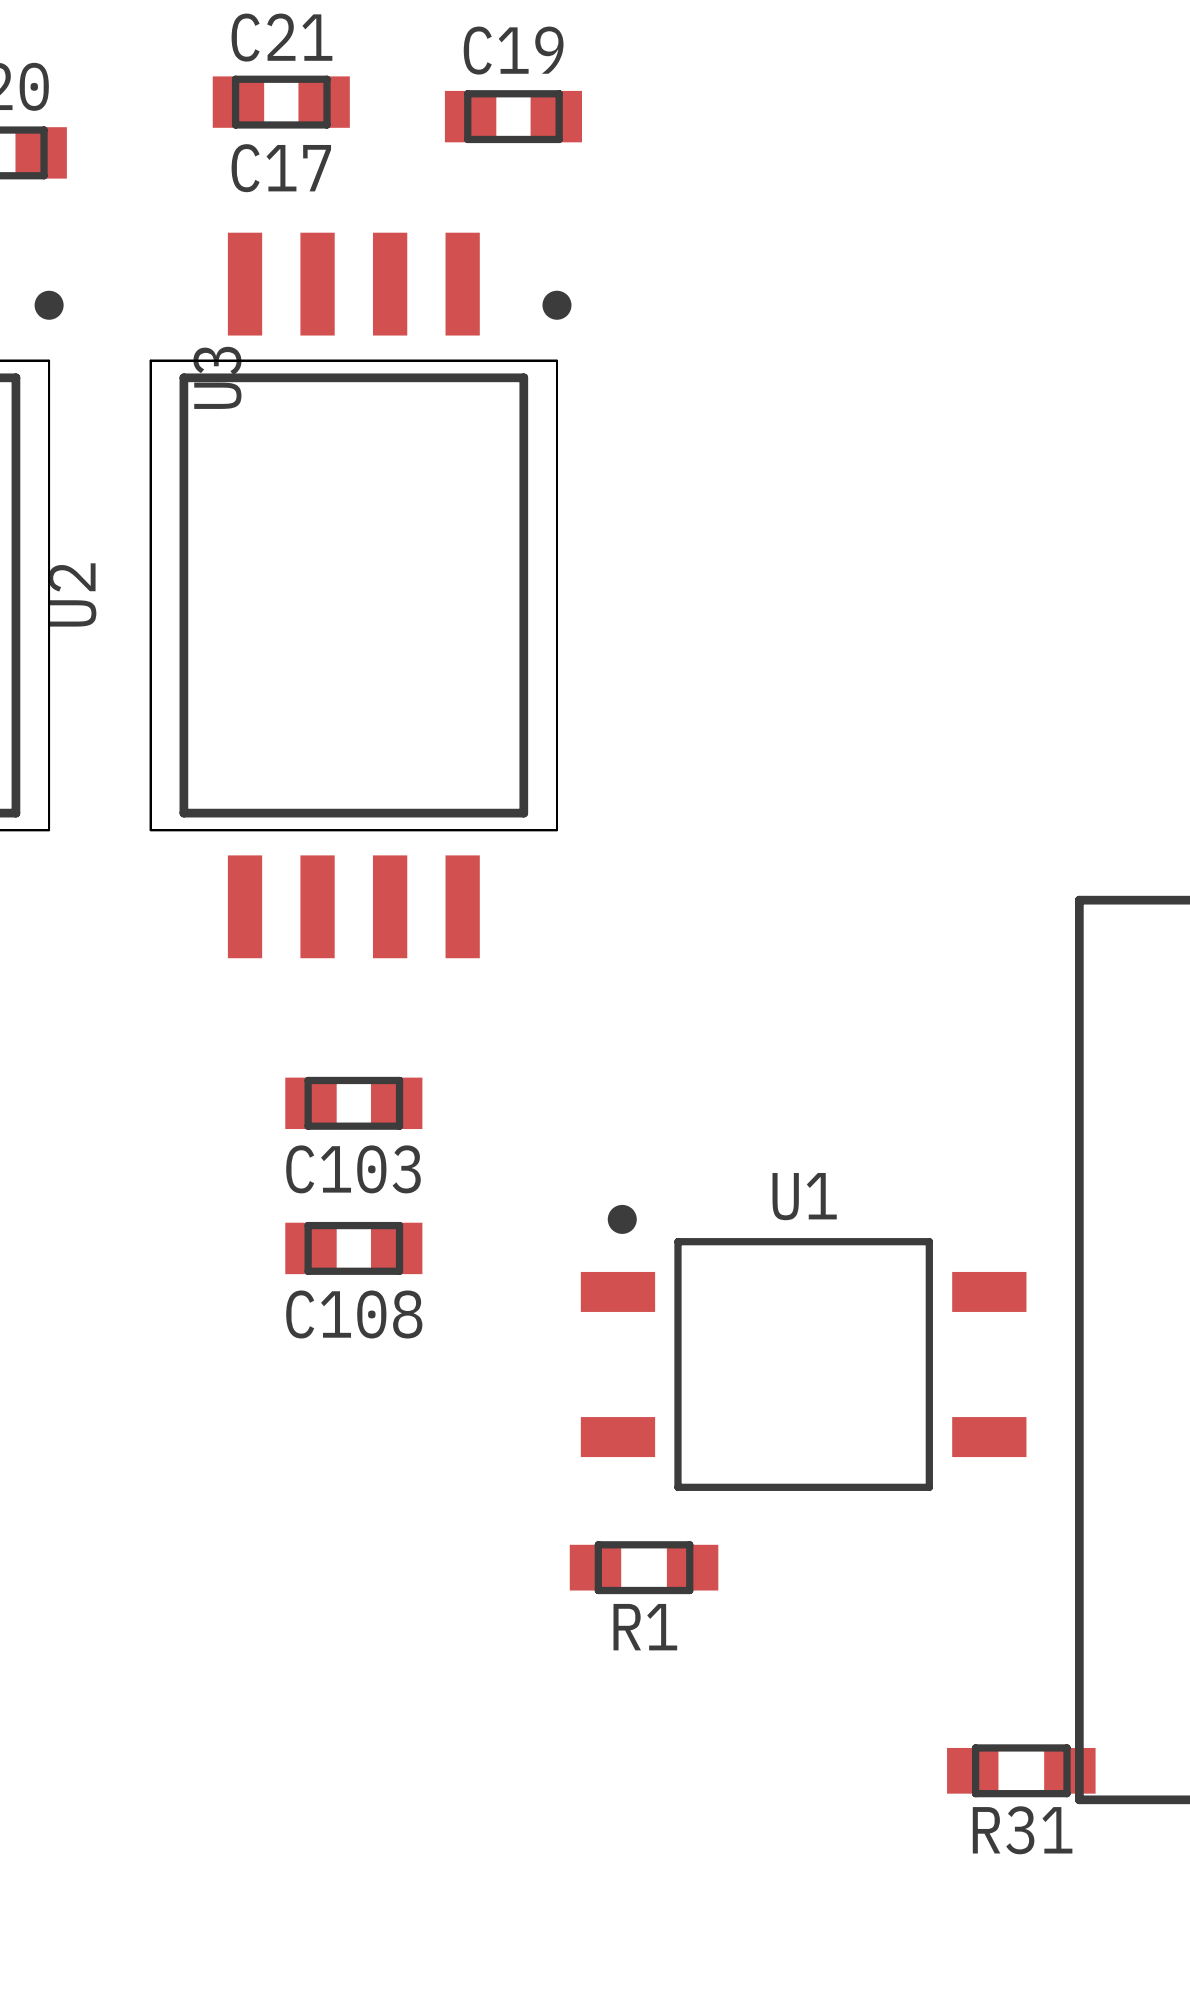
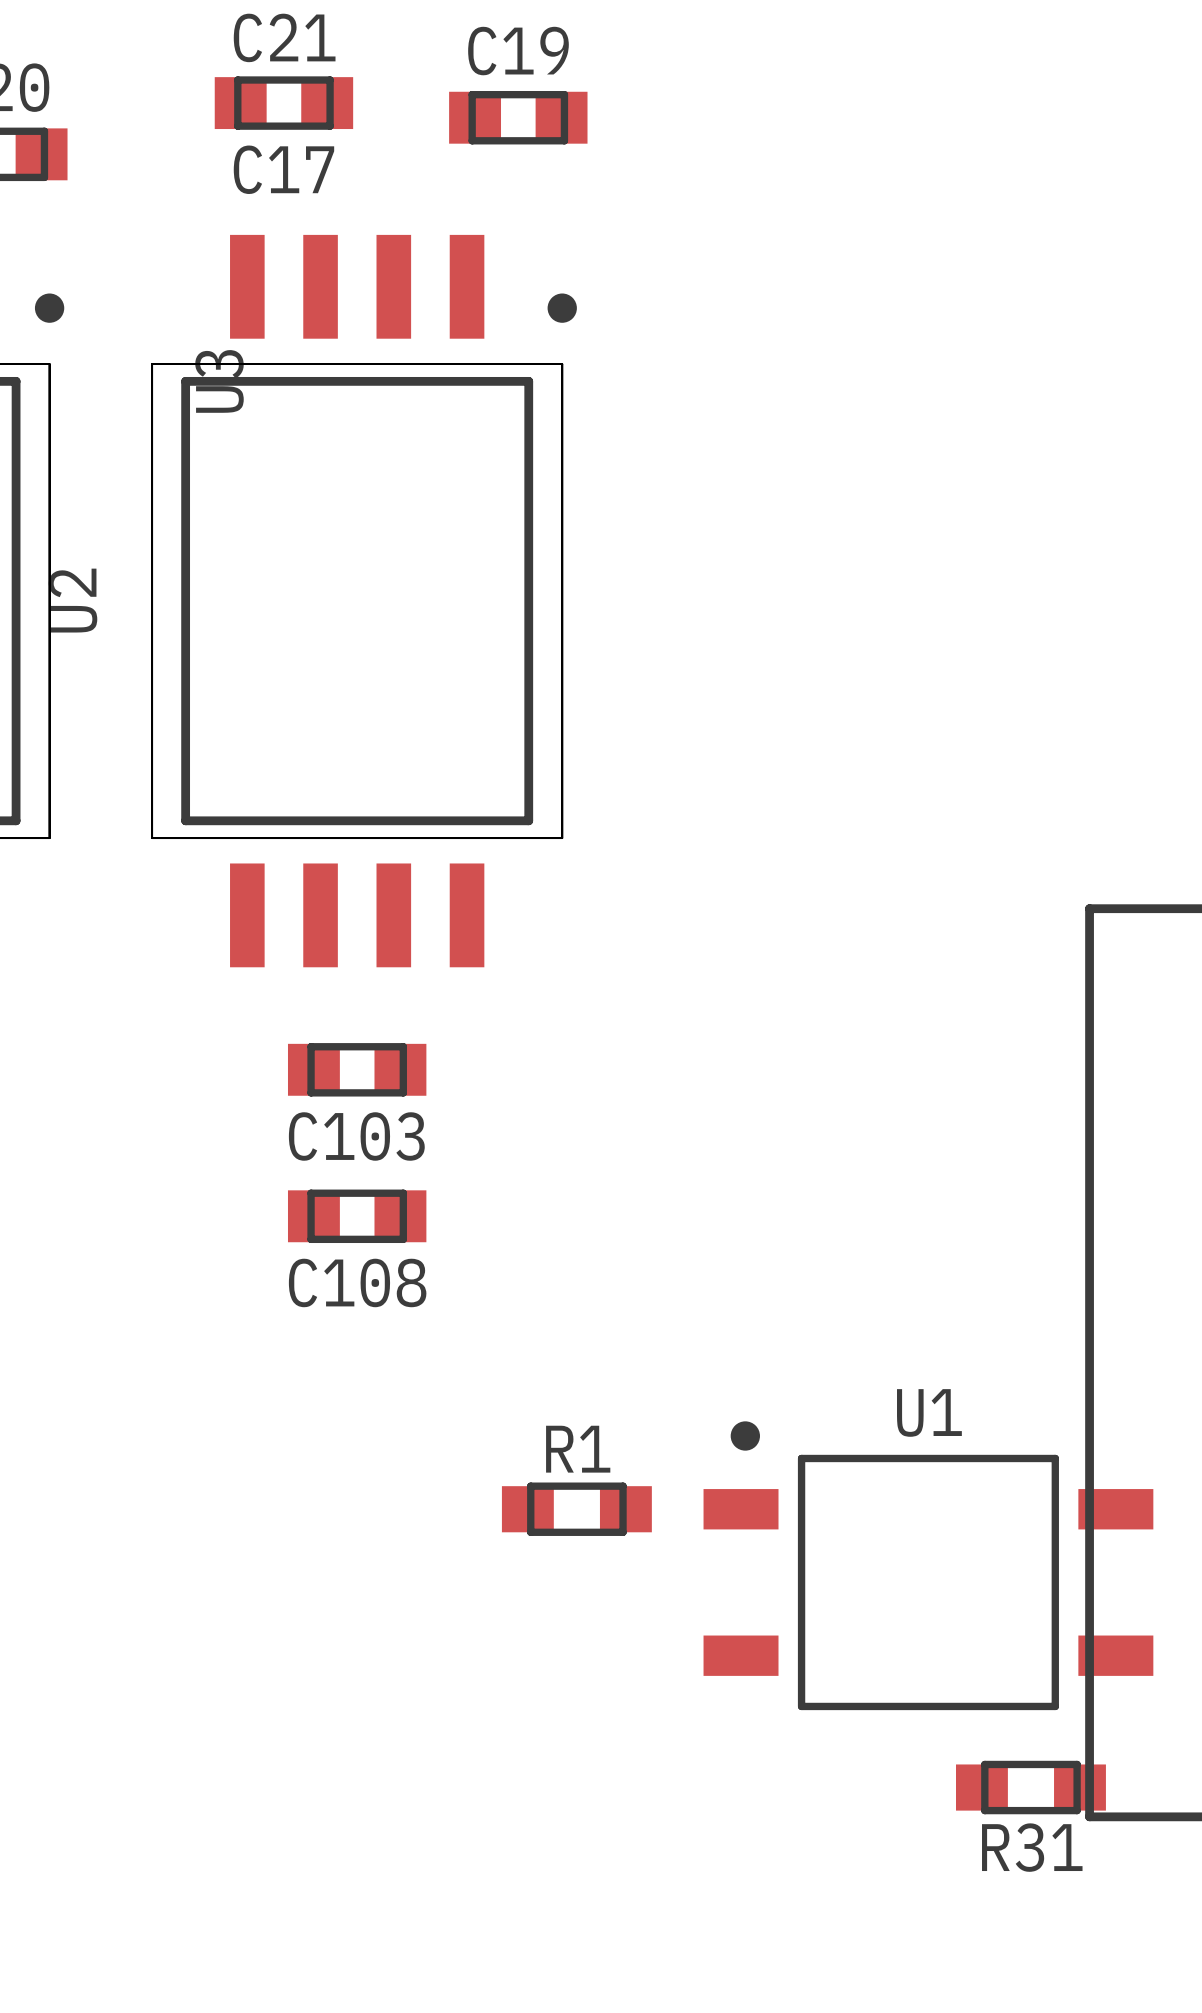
C103 position: (353, 1103) -> (357, 1069)
C108 position: (353, 1248) -> (357, 1216)
U1 position: (803, 1347) -> (928, 1565)
R1 position: (644, 1567) -> (576, 1509)
R1 name position: R1 (645, 1627) -> R1 (578, 1449)

